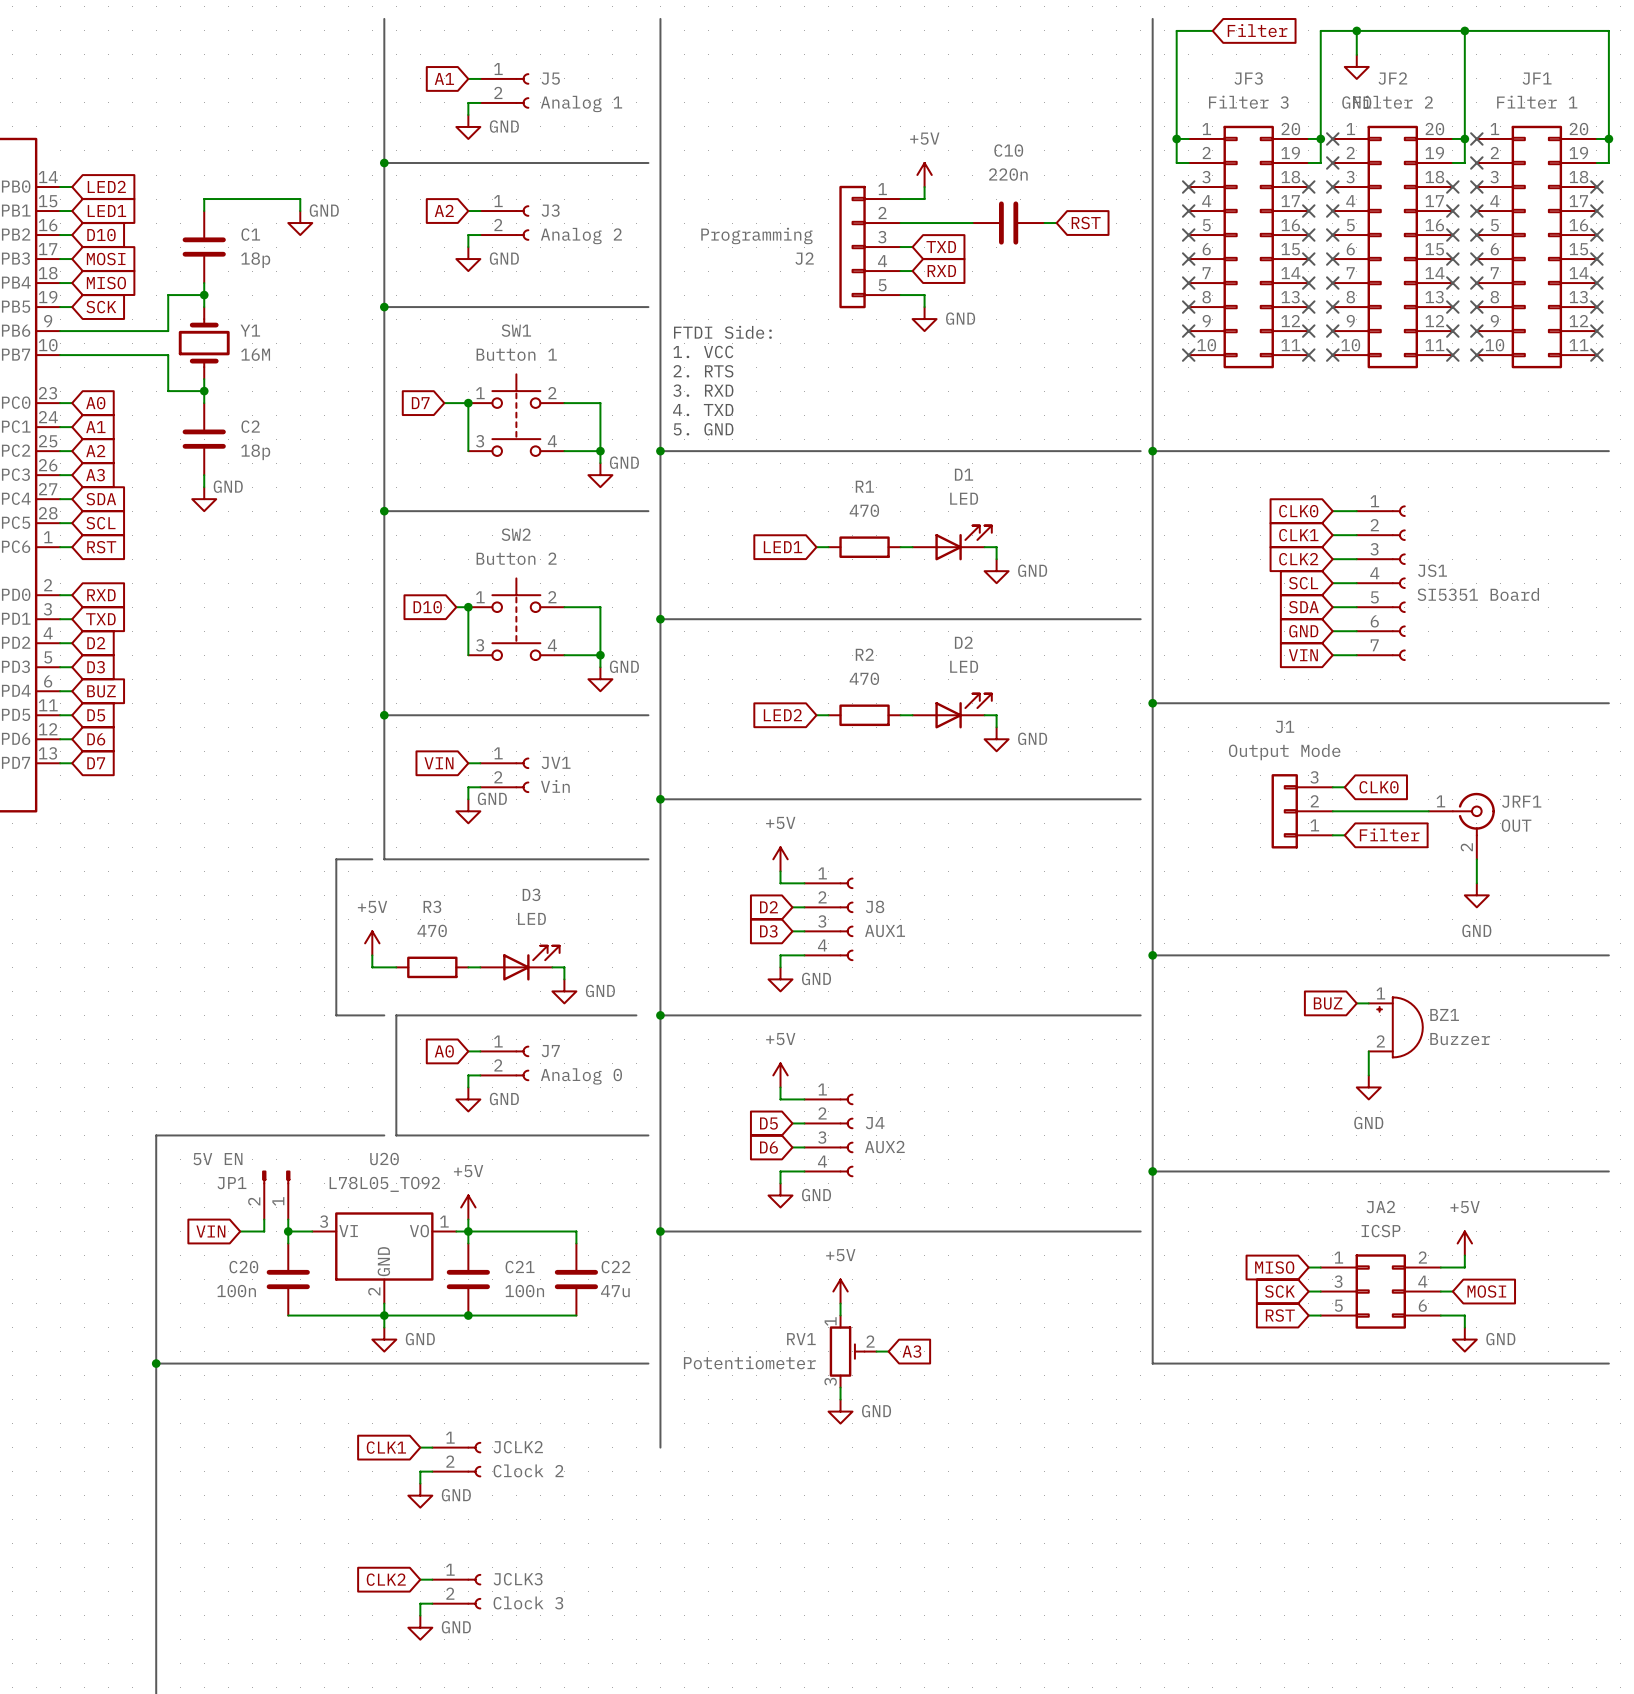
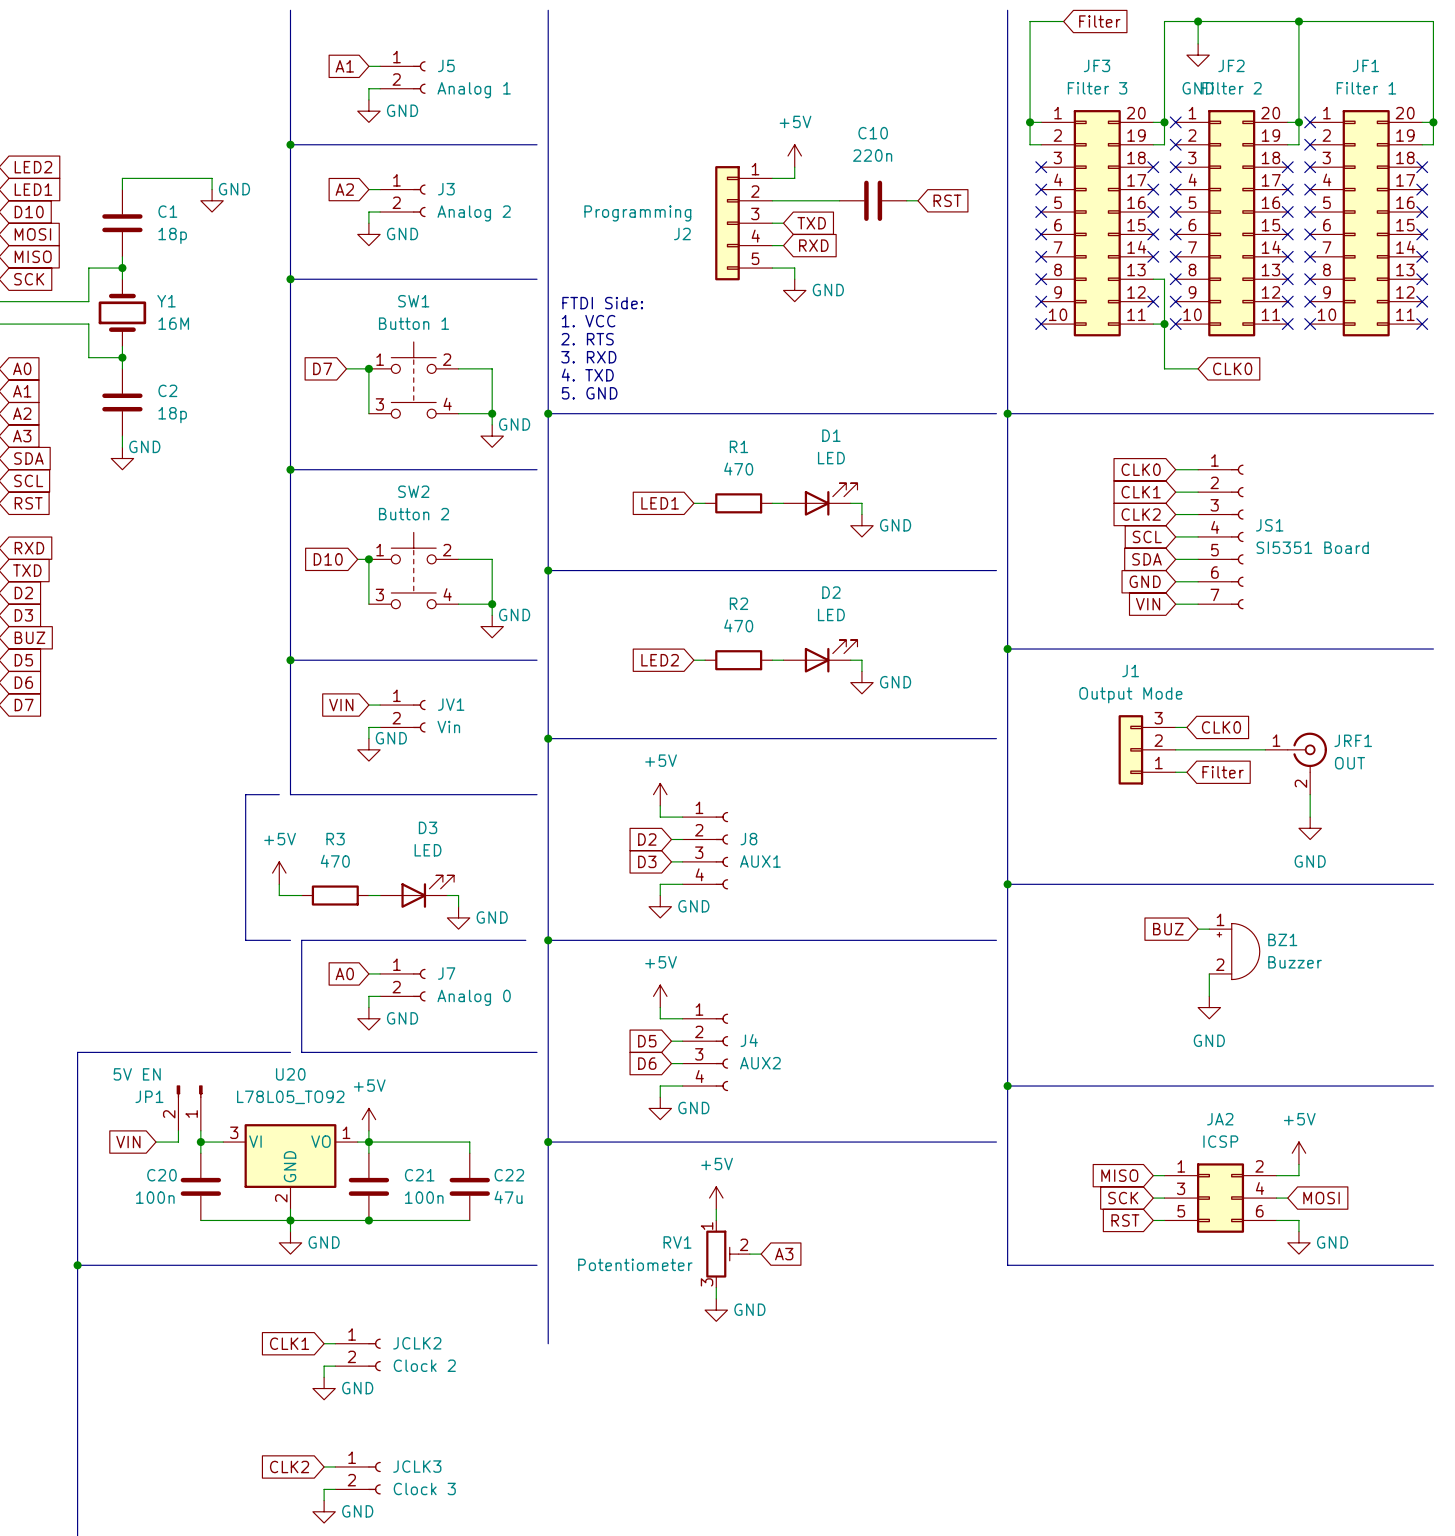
wire: none -> (1153, 279) (1164, 279) (1164, 368) (1198, 368)
no-connect mark: (1308, 307) -> none
wire: none -> (1153, 324) (1164, 324)
no-connect mark: (1308, 355) -> none
junction: none -> (1164, 324)
global label: none -> CLK0 (1232, 368)

